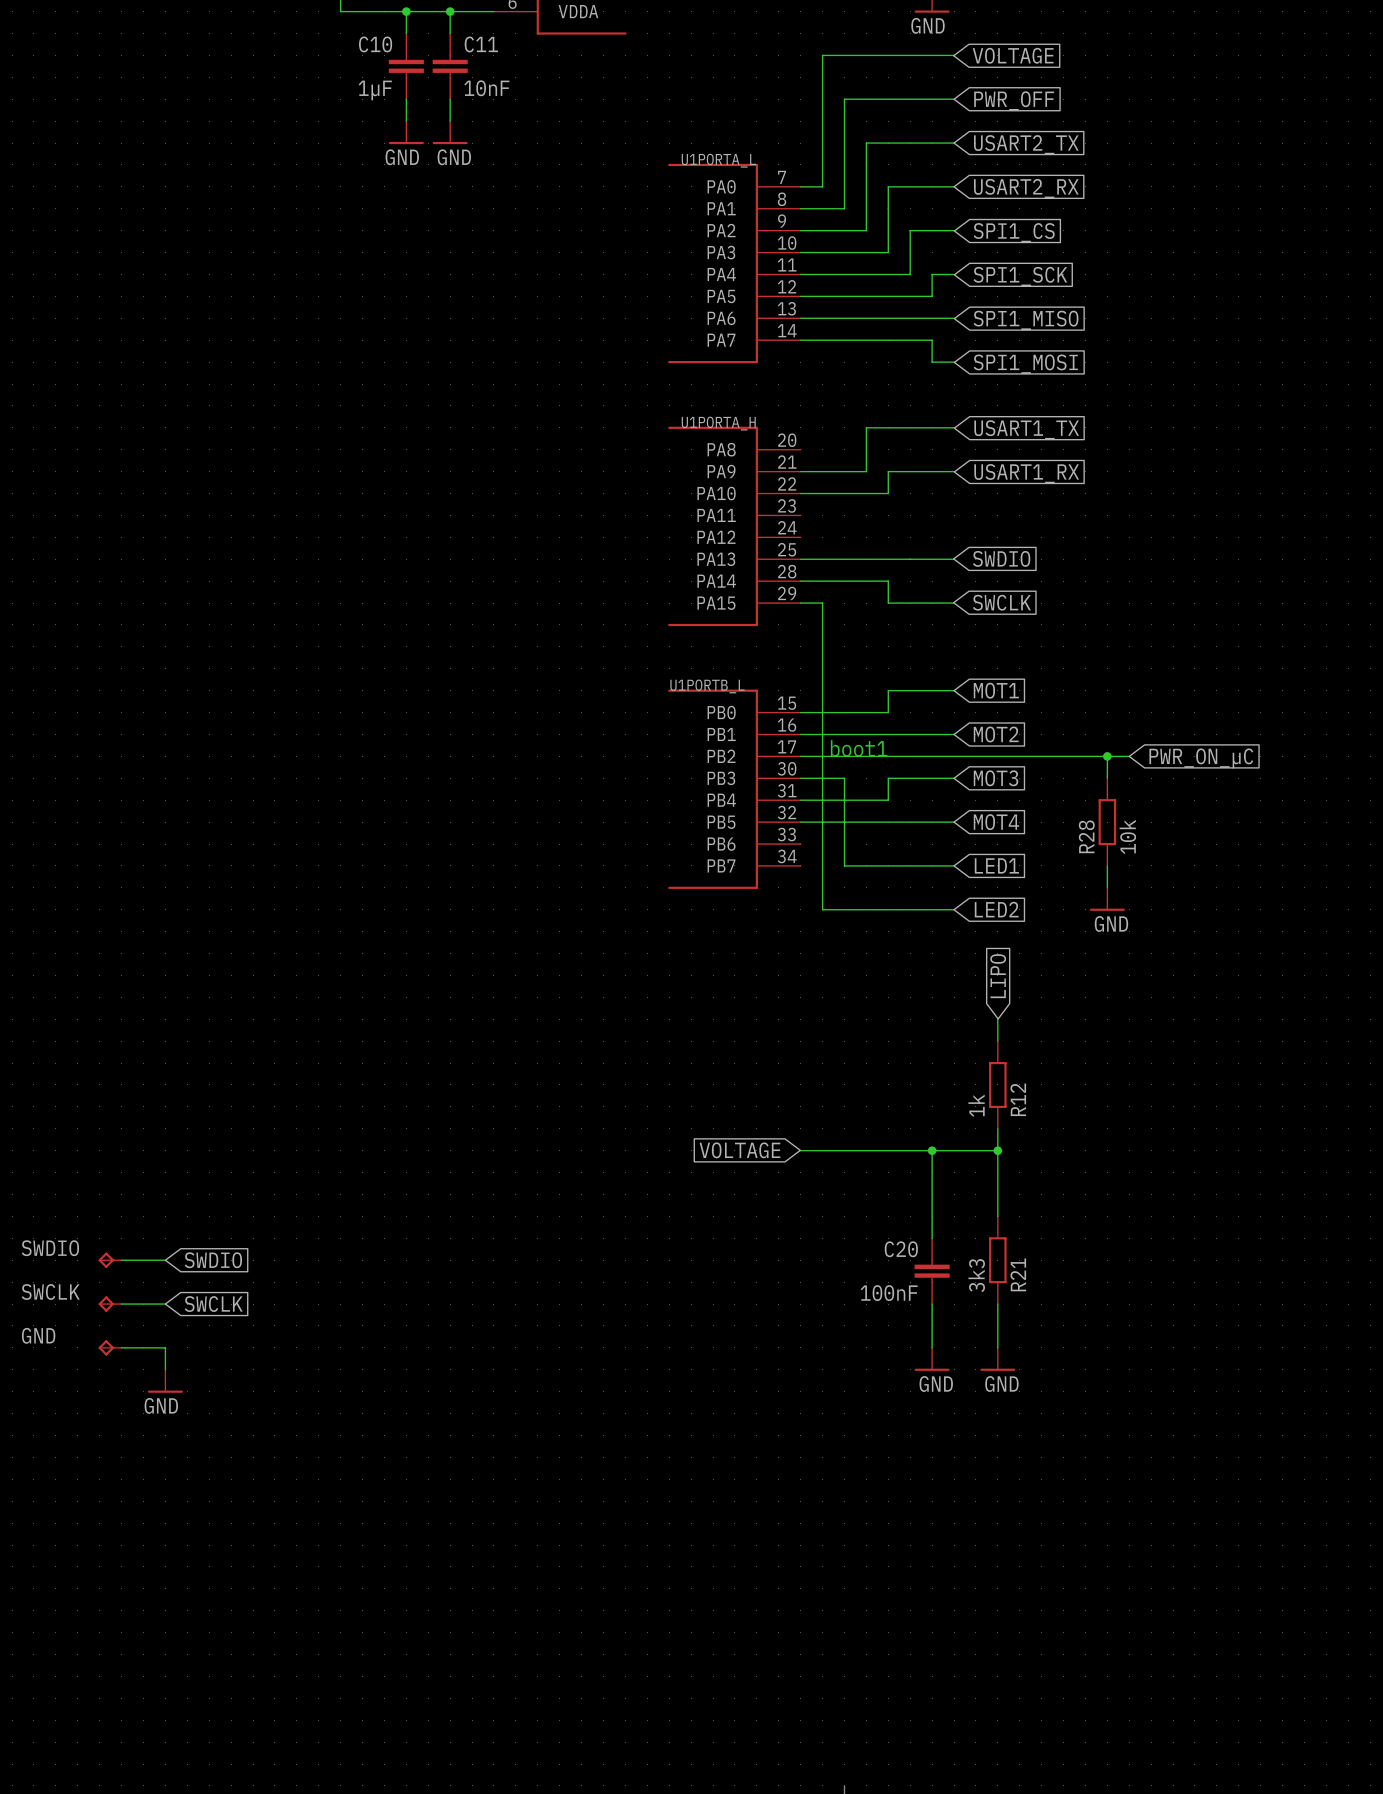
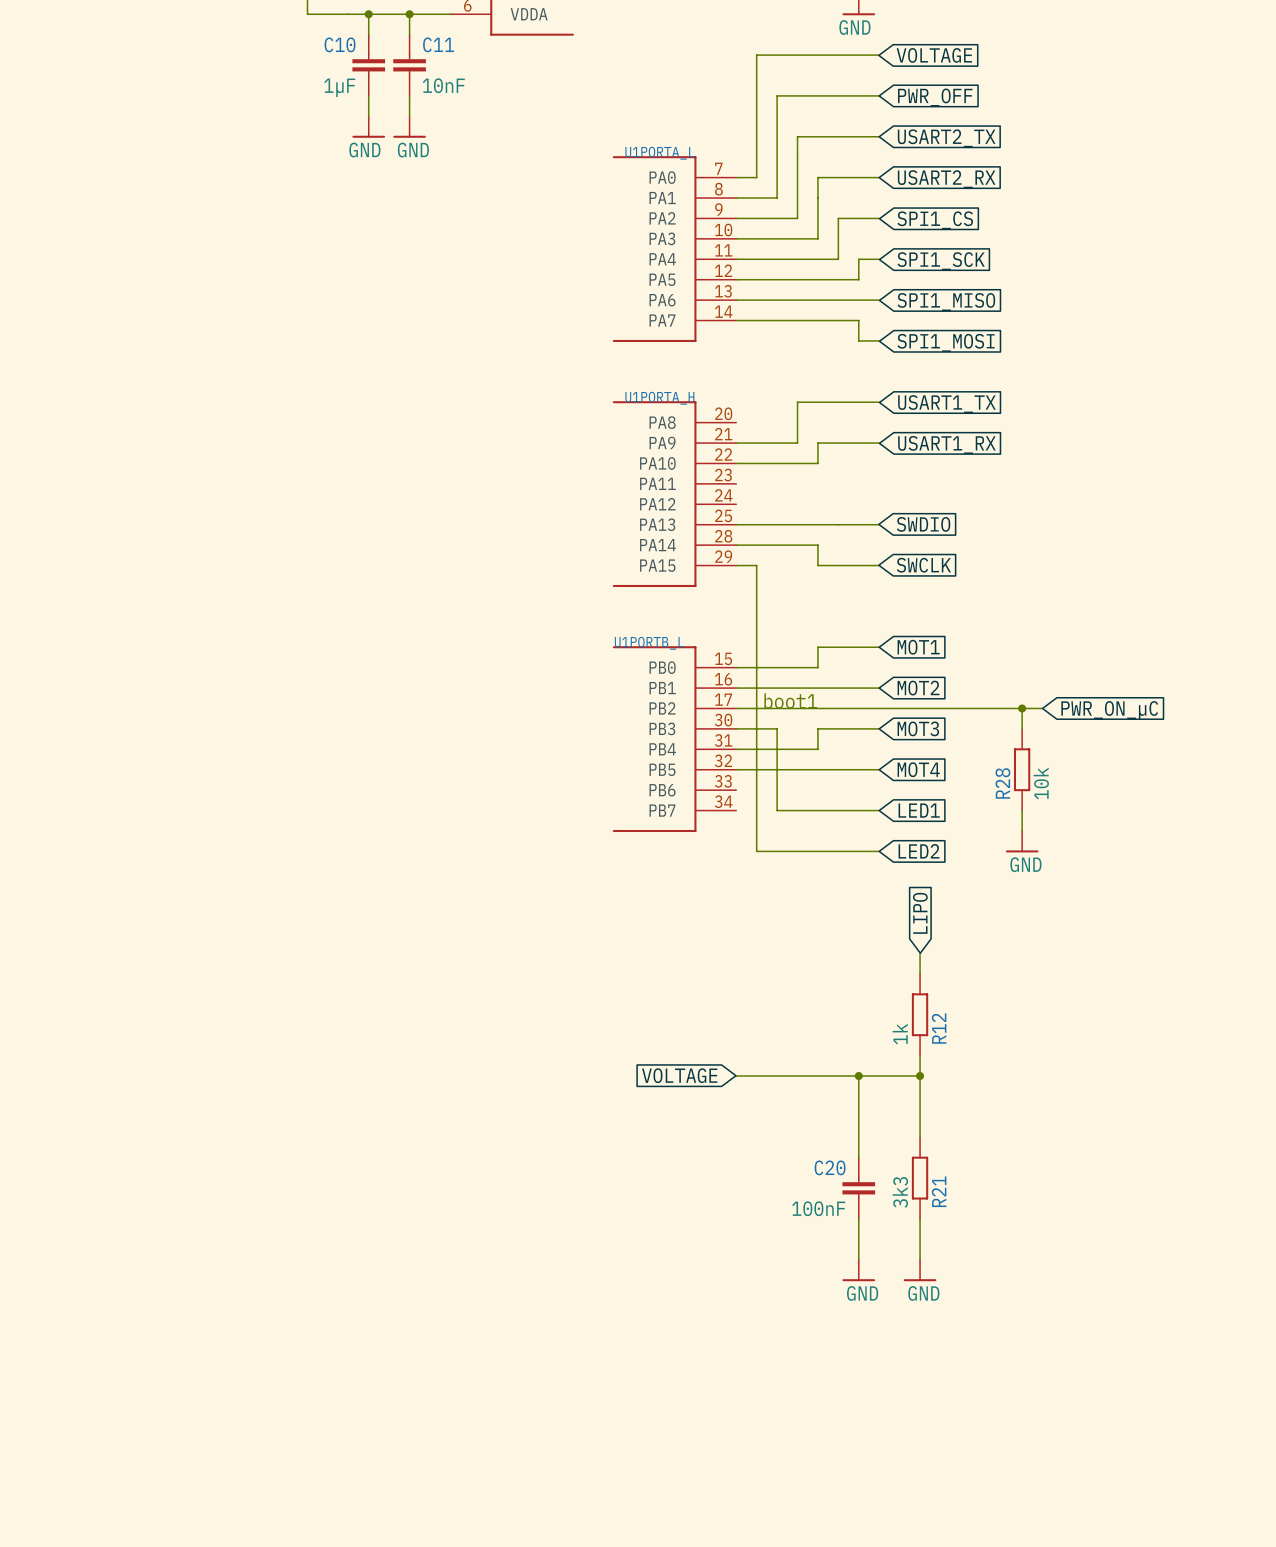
SWDIO: (110, 1260) -> none
wire: (121, 1260) (165, 1260) -> none
global label: SWDIO (213, 1260) -> none
SWCLK: (110, 1304) -> none
wire: (121, 1304) (165, 1304) -> none
global label: SWCLK (213, 1304) -> none
GND: (110, 1347) -> none
wire: (121, 1347) (165, 1347) (165, 1369) -> none
power symbol: GND (165, 1381) -> none

